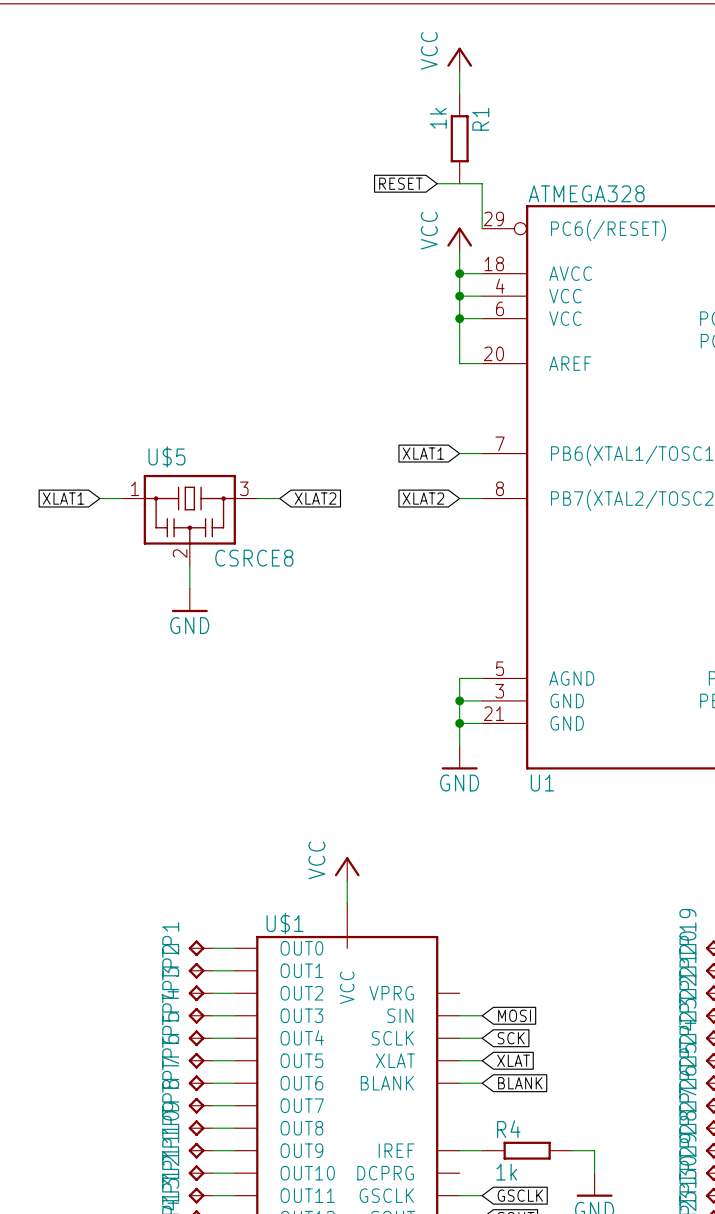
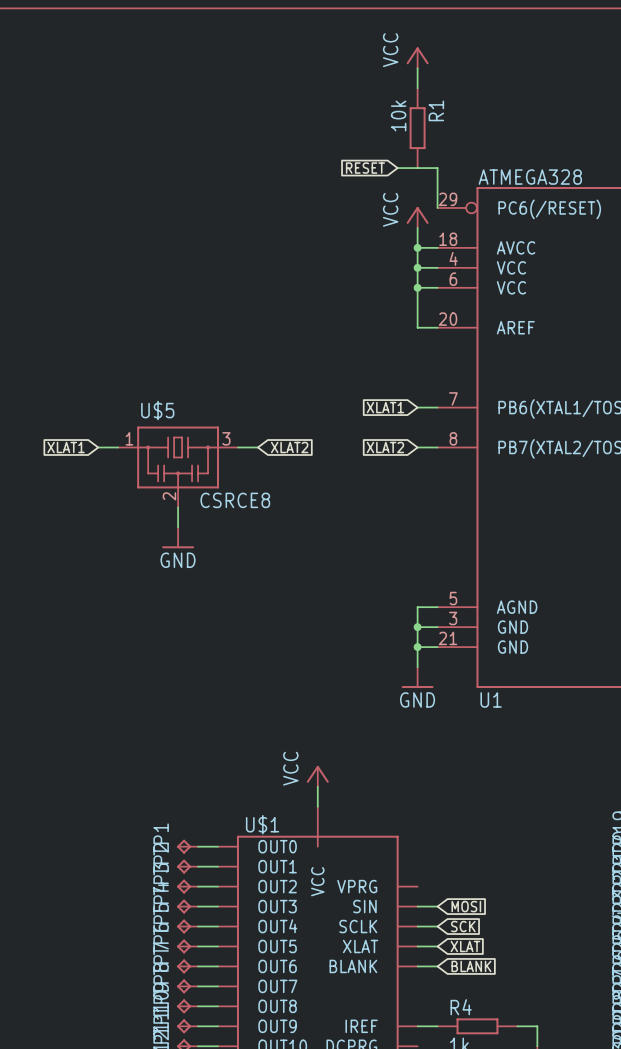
R1 value: 1k (438, 118) -> 10k (398, 115)

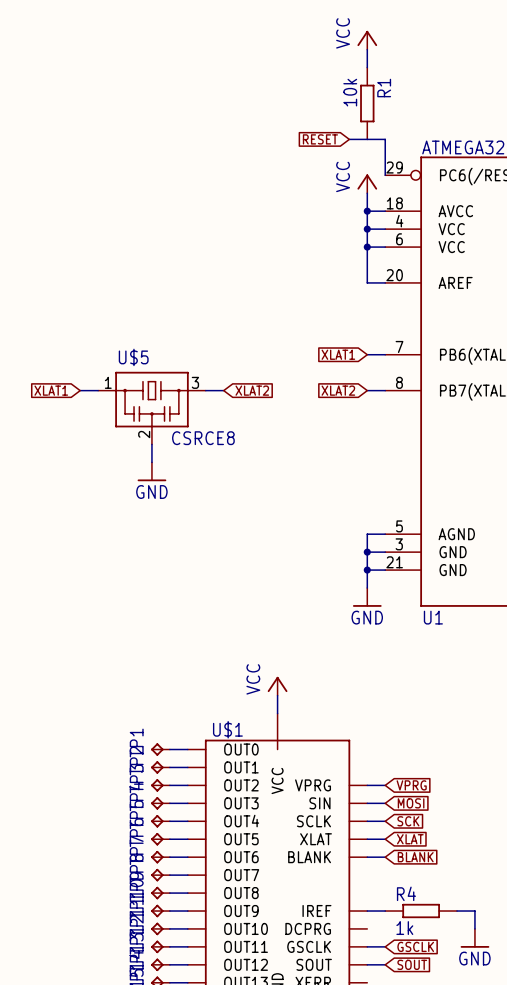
wire: none -> (367, 785) (385, 785)
global label: none -> VPRG (411, 785)

